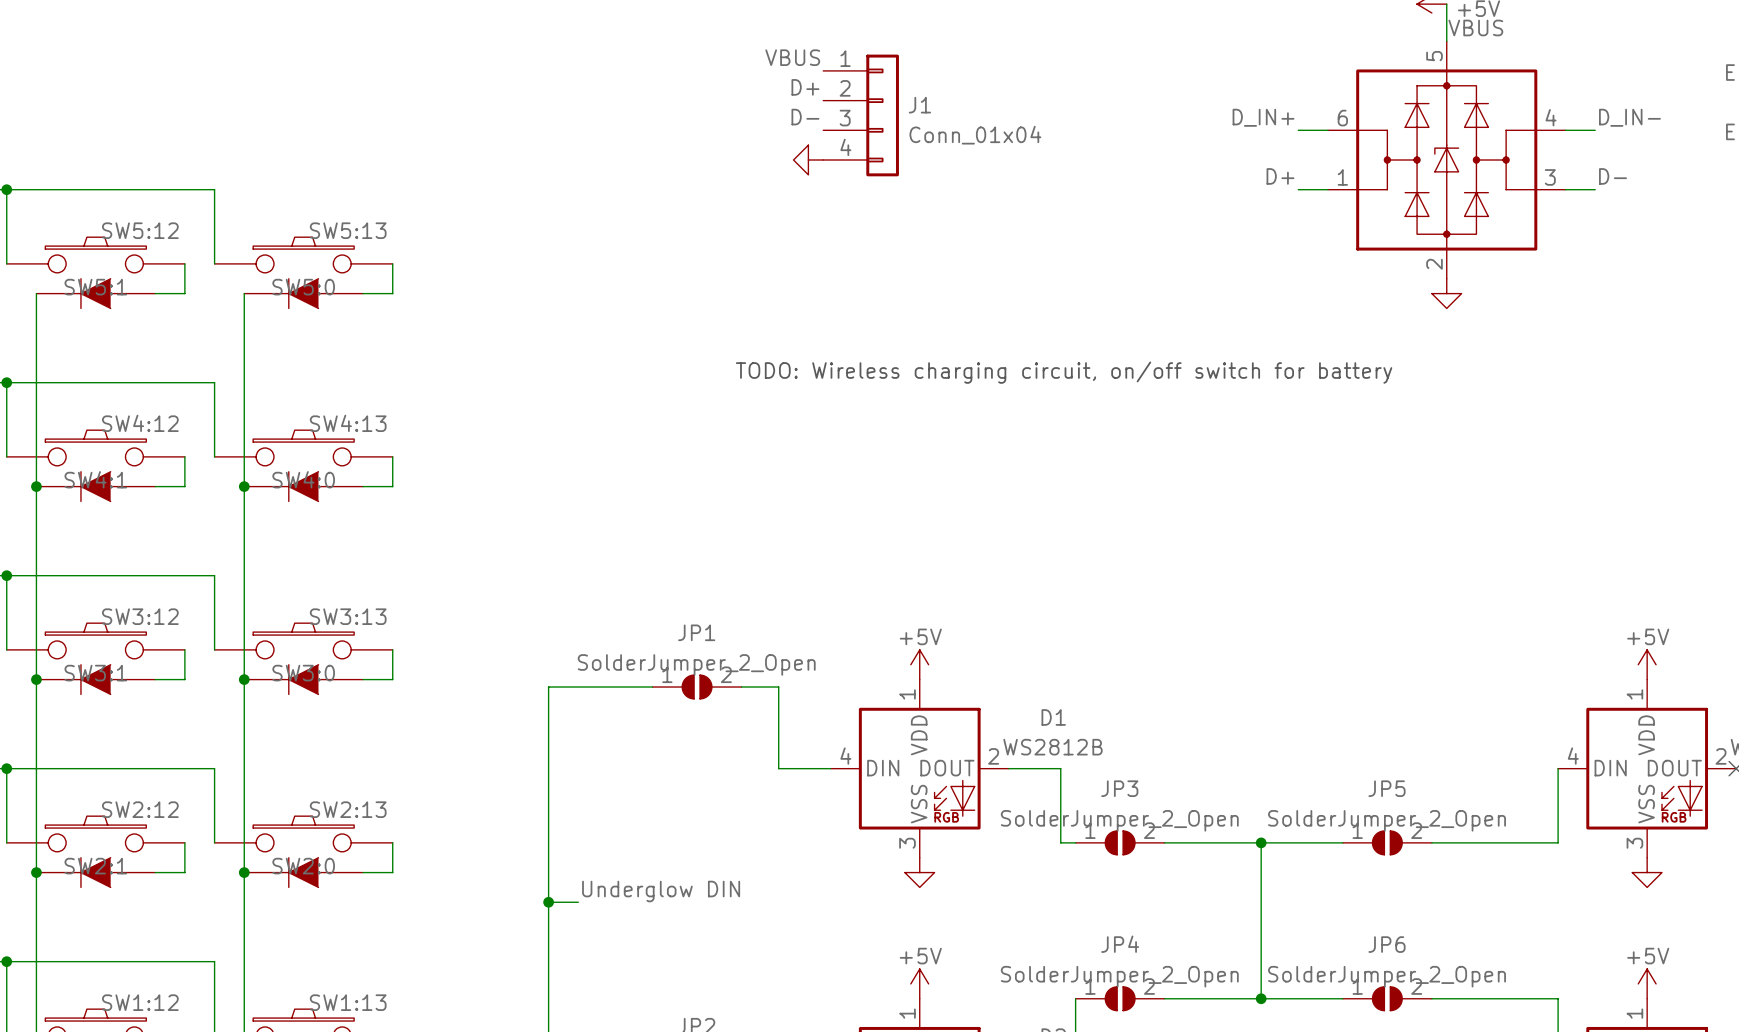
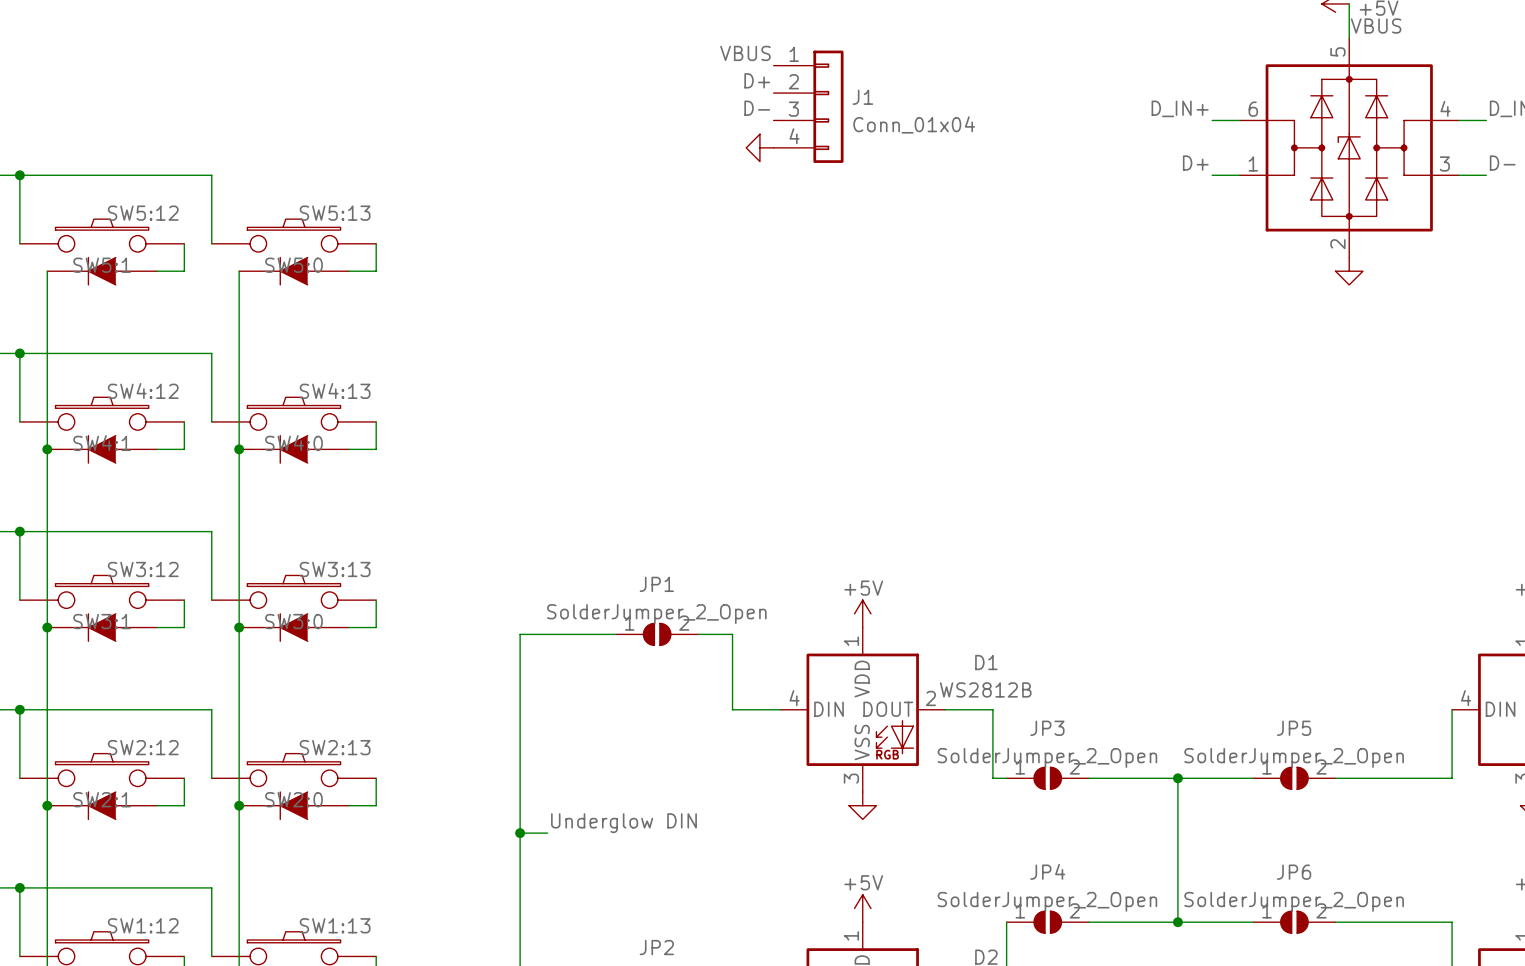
text: TODO: Wireless charging circuit, on/off switch for battery (1064, 372) -> none

